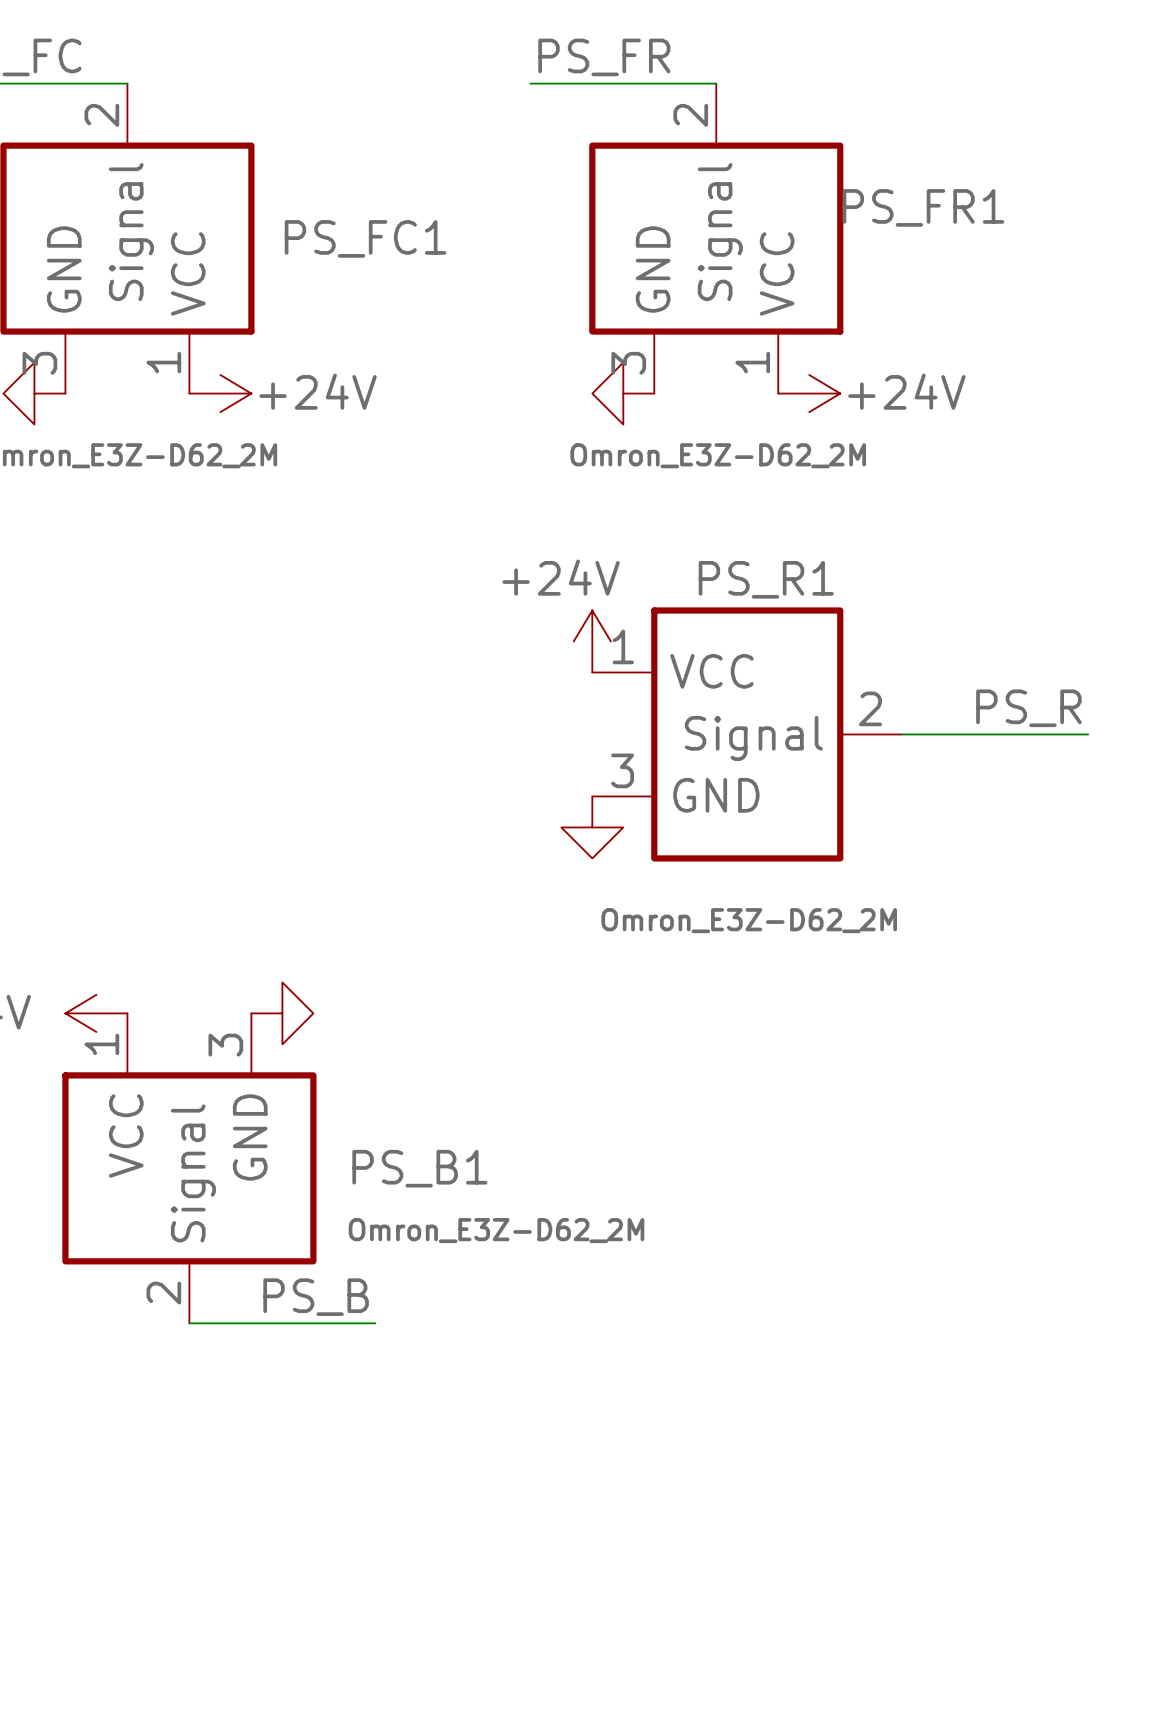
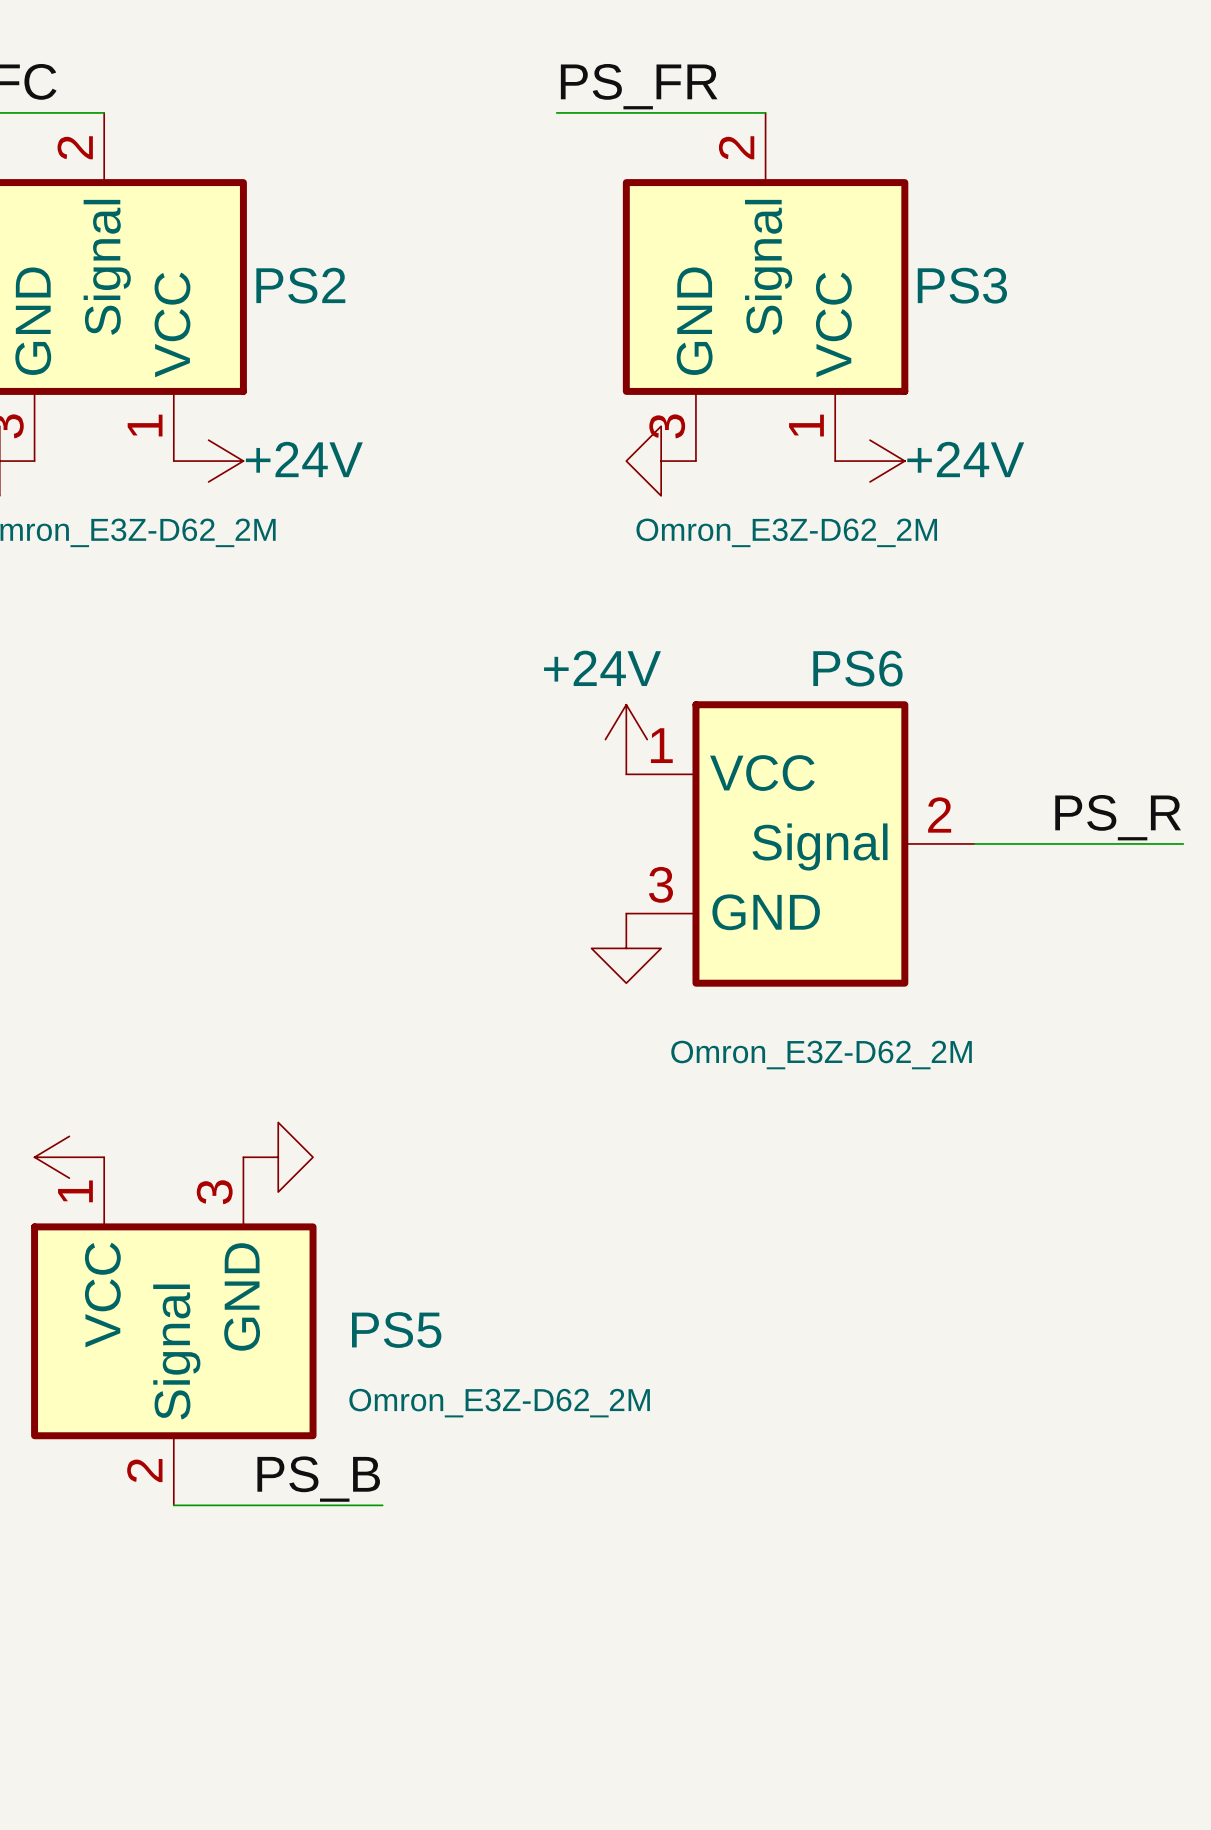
PS_FR1 name: PS_FR1 (923, 207) -> PS3 (962, 285)
PS_FC1 name: PS_FC1 (365, 238) -> PS2 (300, 285)
PS_R1 name: PS_R1 (766, 579) -> PS6 (857, 668)
PS_B1 name: PS_B1 (419, 1168) -> PS5 (396, 1330)

